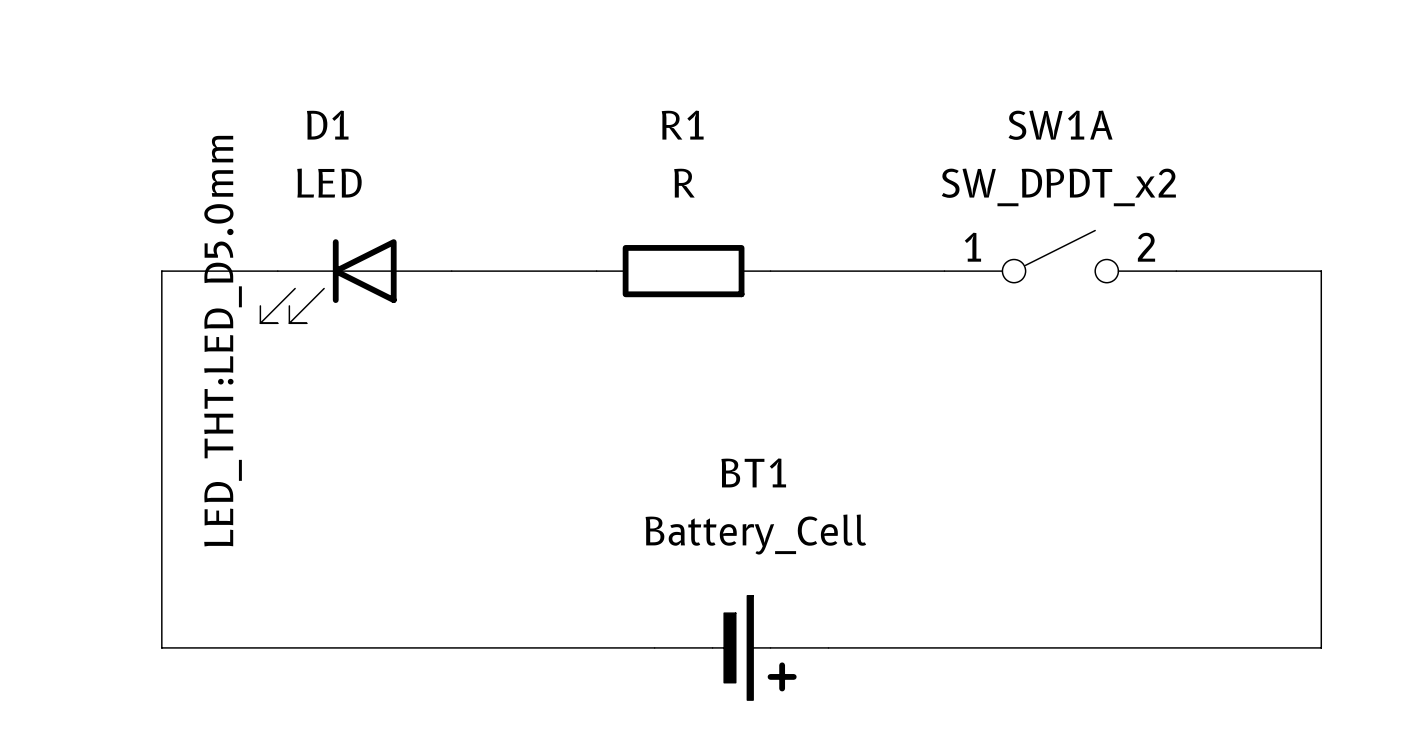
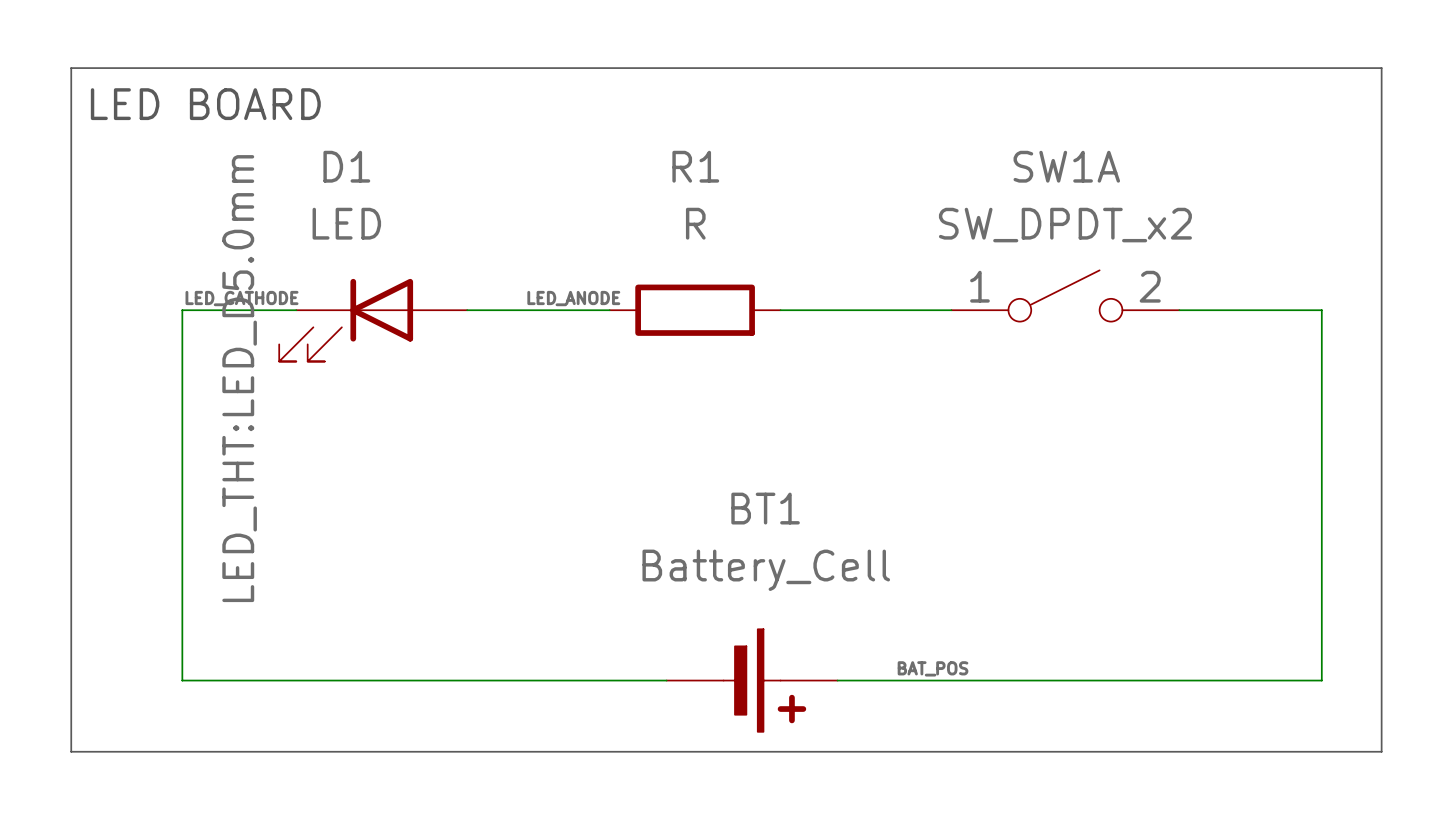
line: none -> (71, 68) (1381, 68) (1381, 751) (71, 751) (71, 68)
text: none -> LED BOARD (205, 104)
label: none -> LED_CATHODE (242, 298)
label: none -> LED_ANODE (573, 298)
label: none -> BAT_POS (933, 668)

